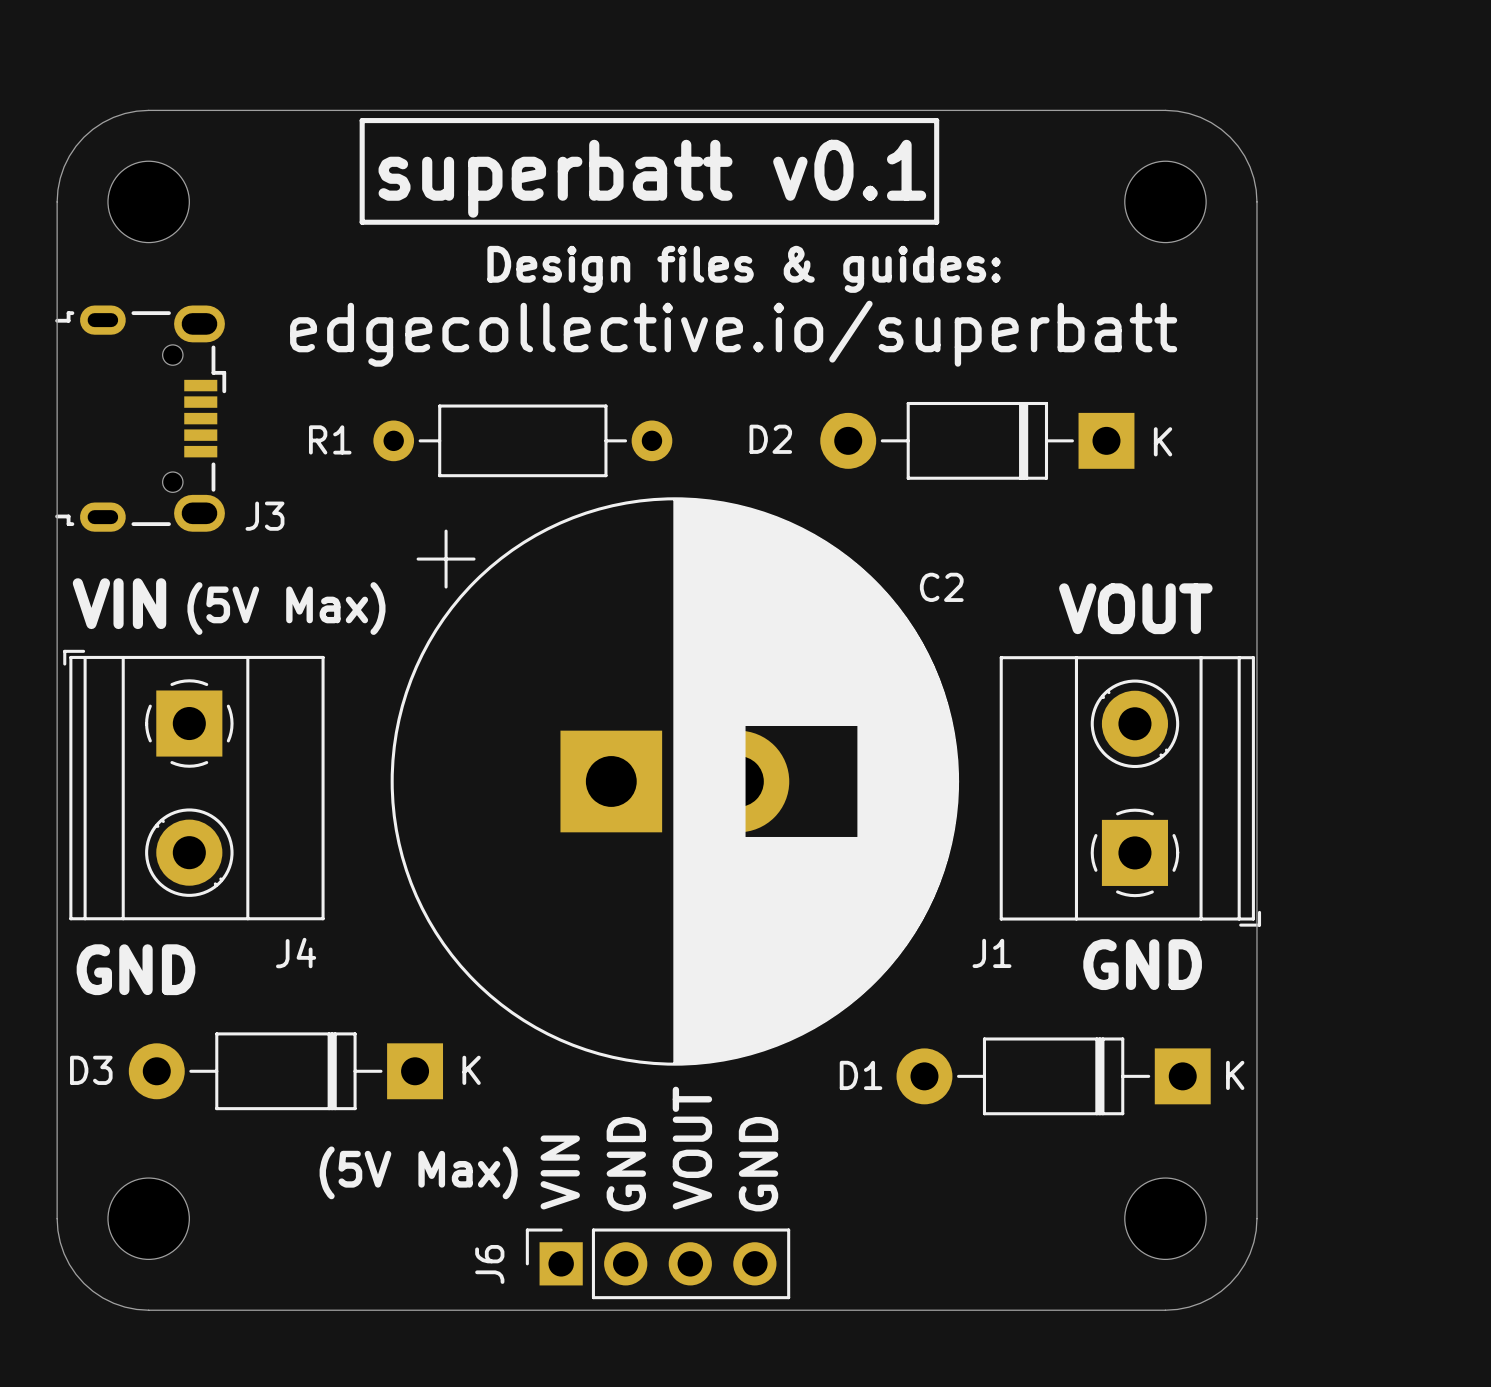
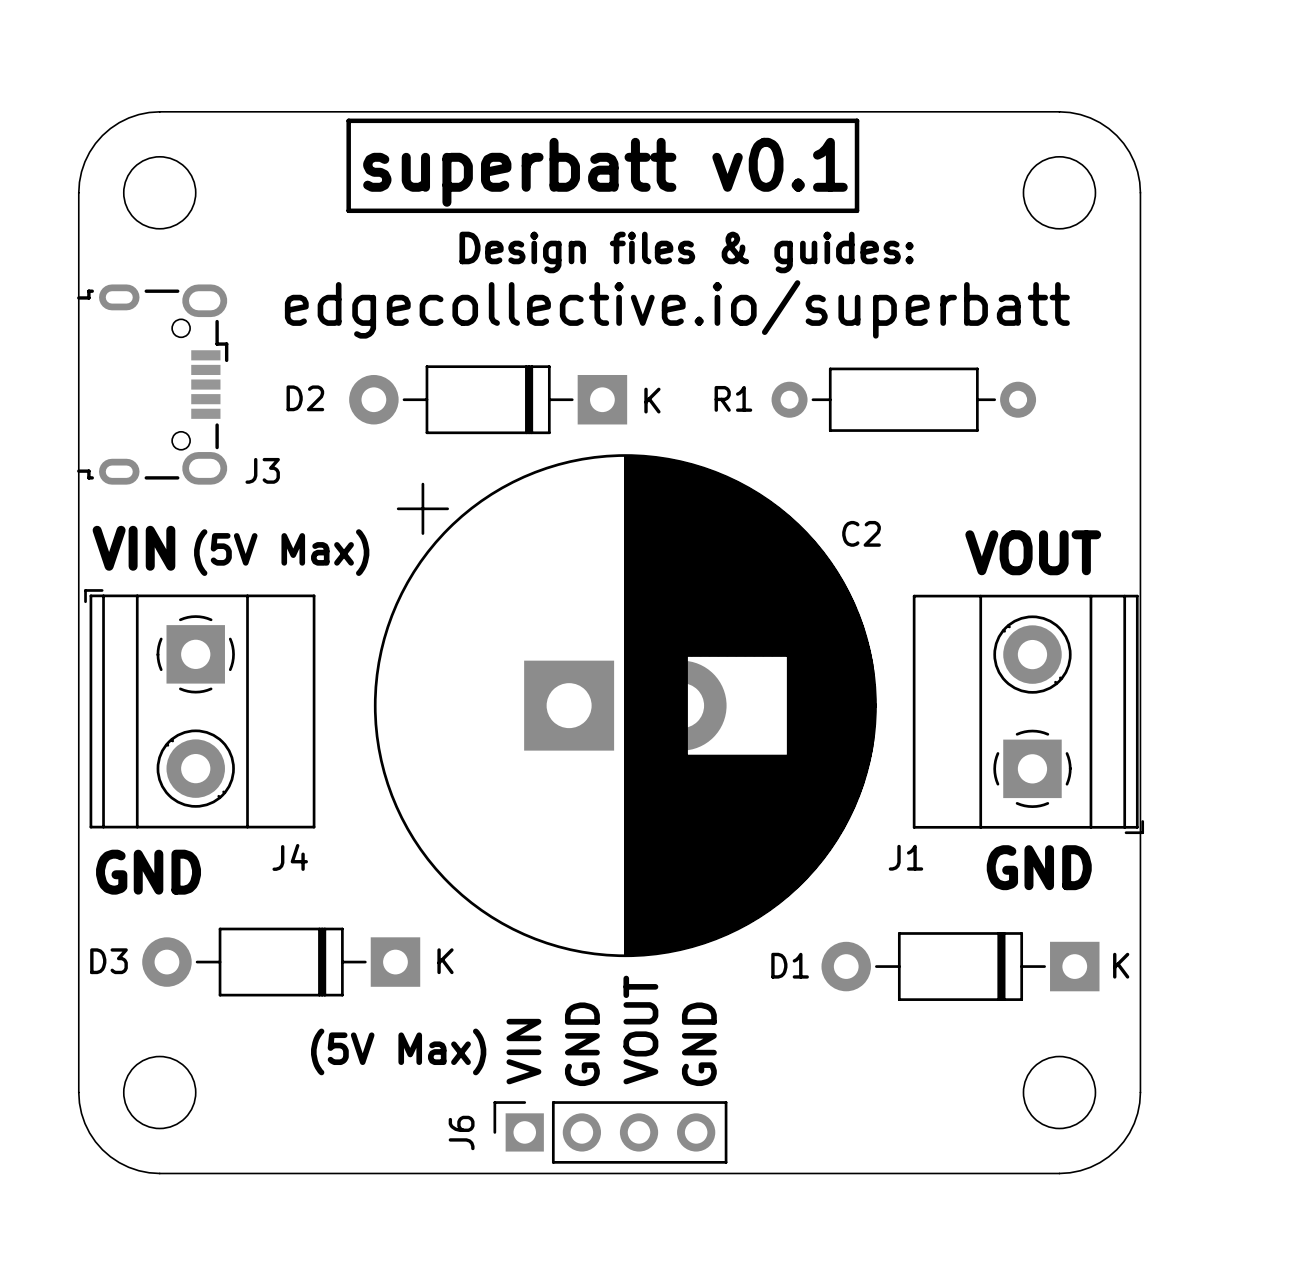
R1 position: (522, 440) -> (903, 399)
D2 position: (977, 440) -> (488, 399)

